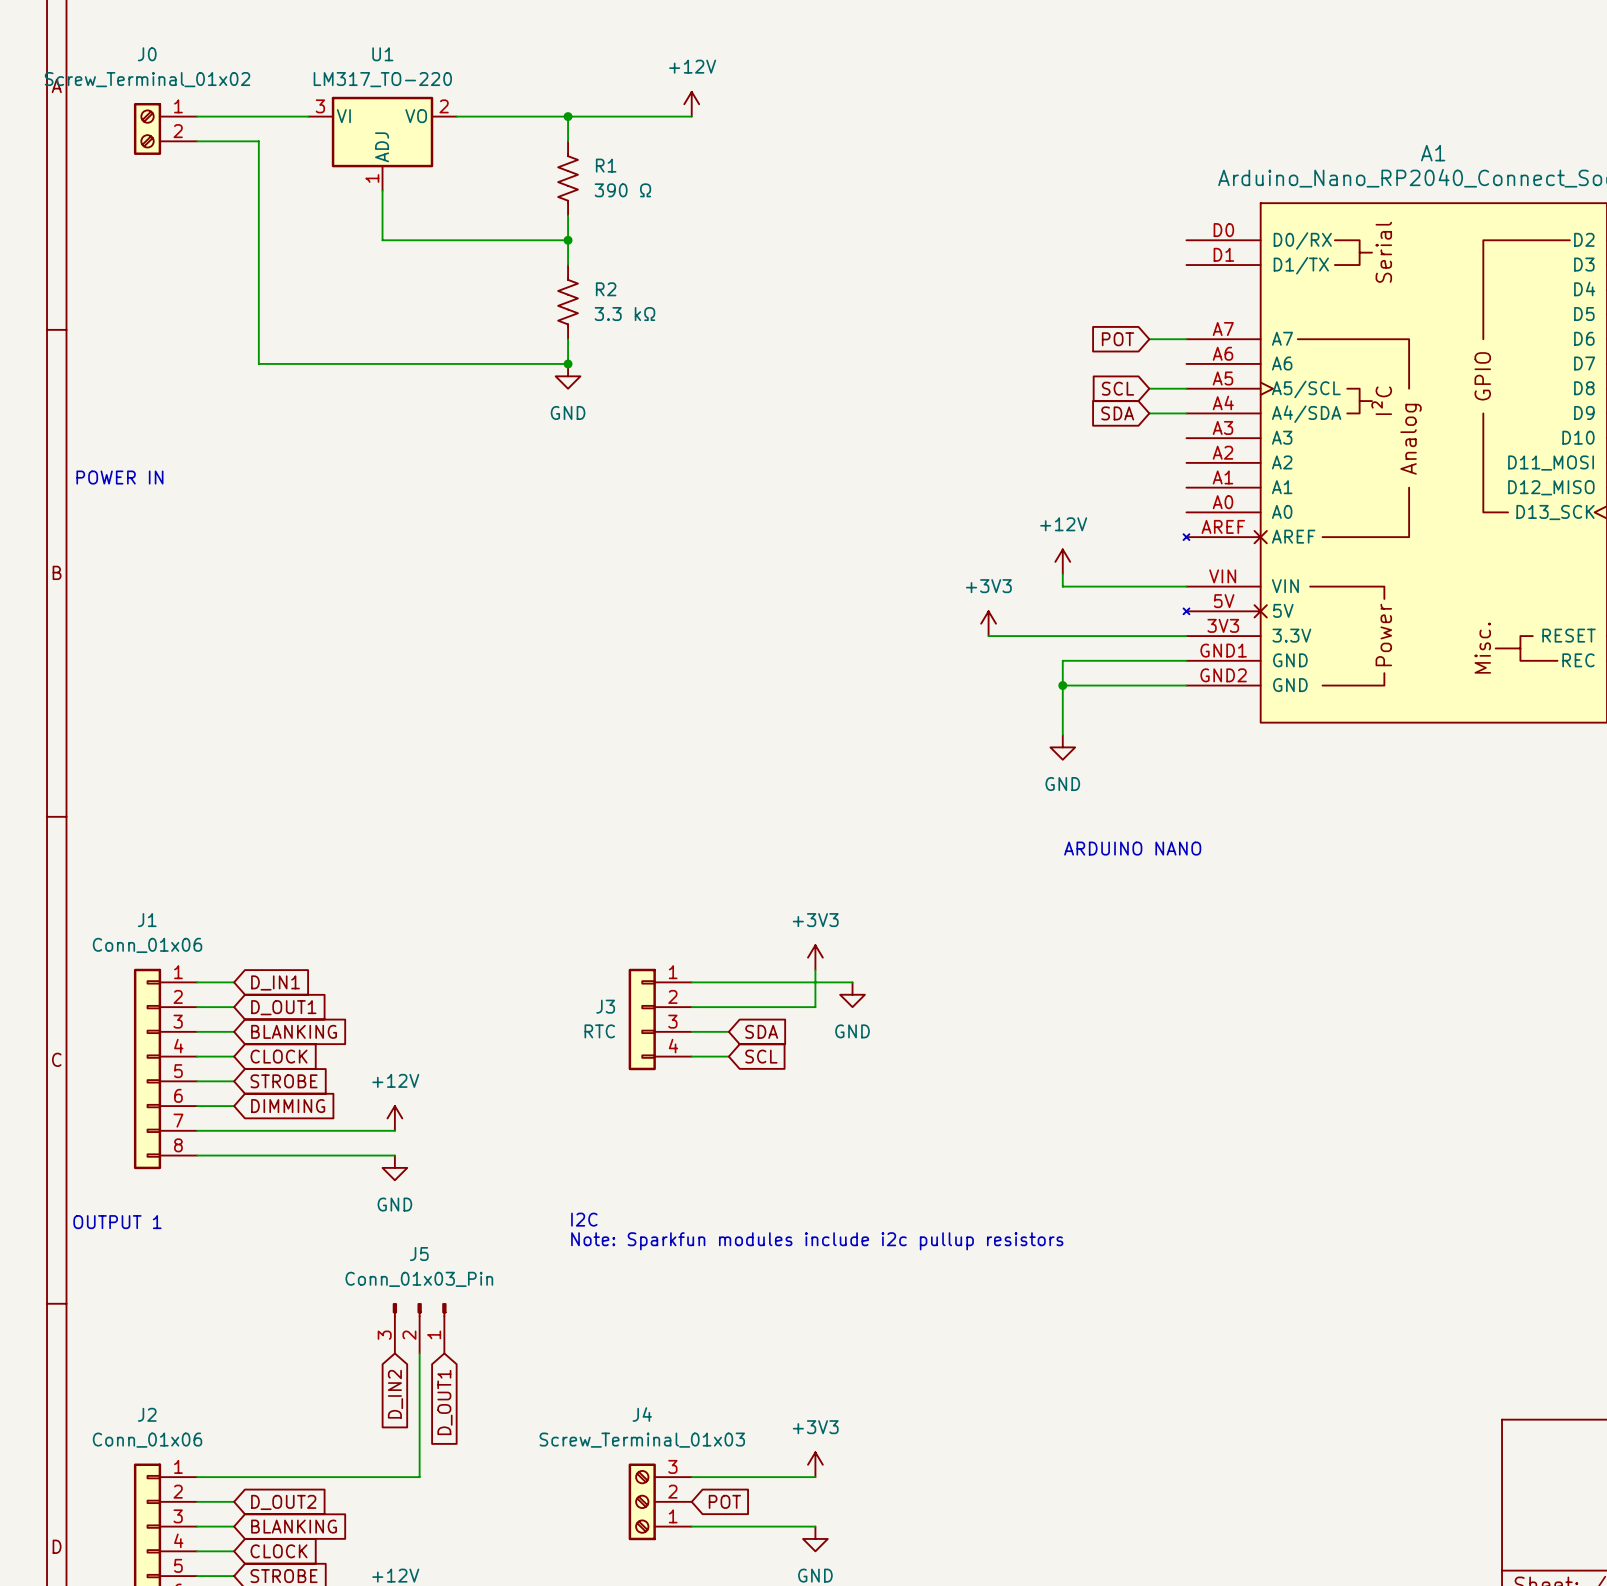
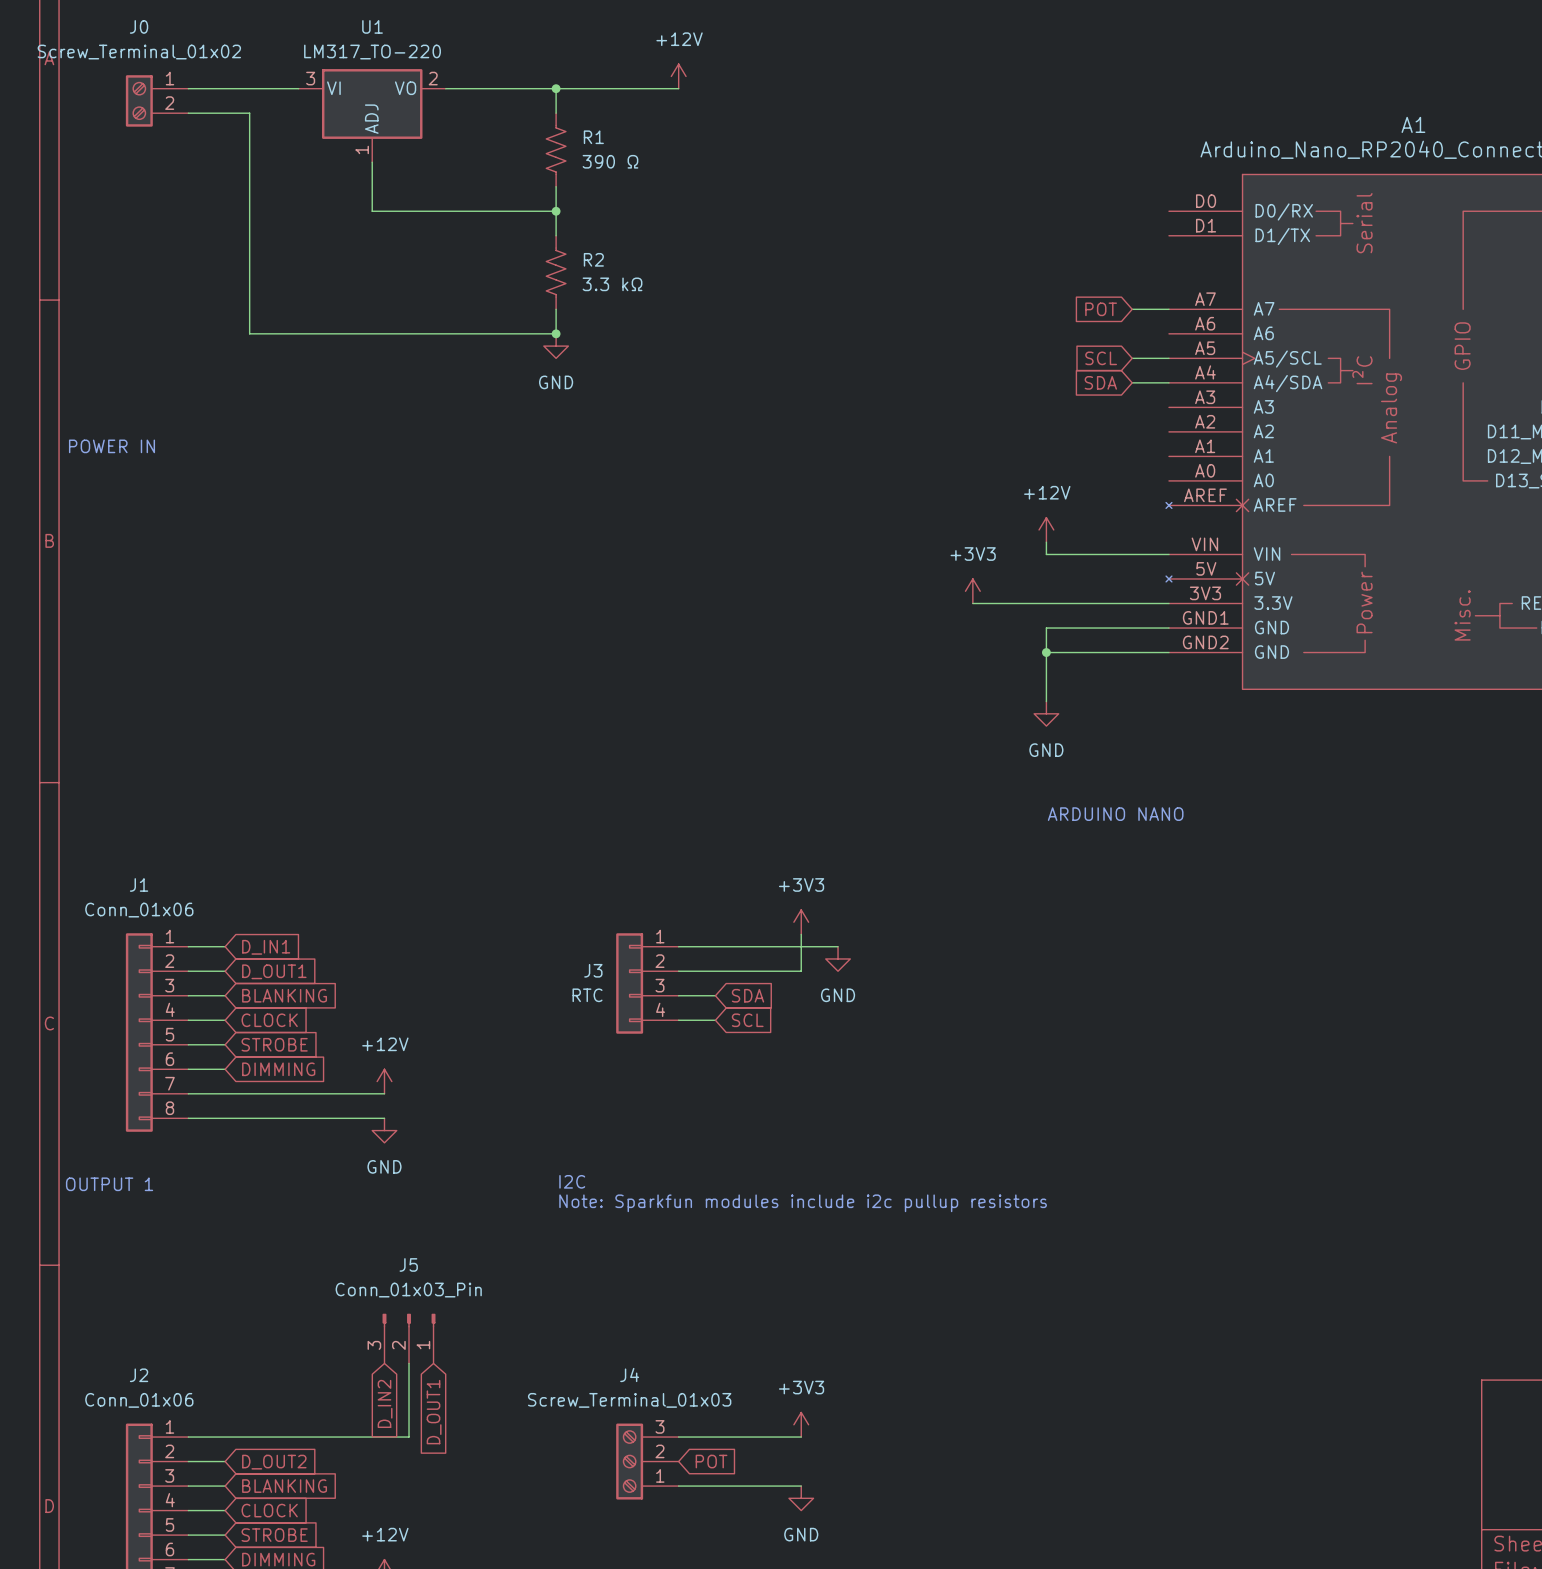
J5 position: (419, 1328) -> (409, 1338)
global label position: D_IN2 (395, 1394) -> D_IN2 (385, 1403)
global label position: D_OUT1 (444, 1402) -> D_OUT1 (434, 1412)

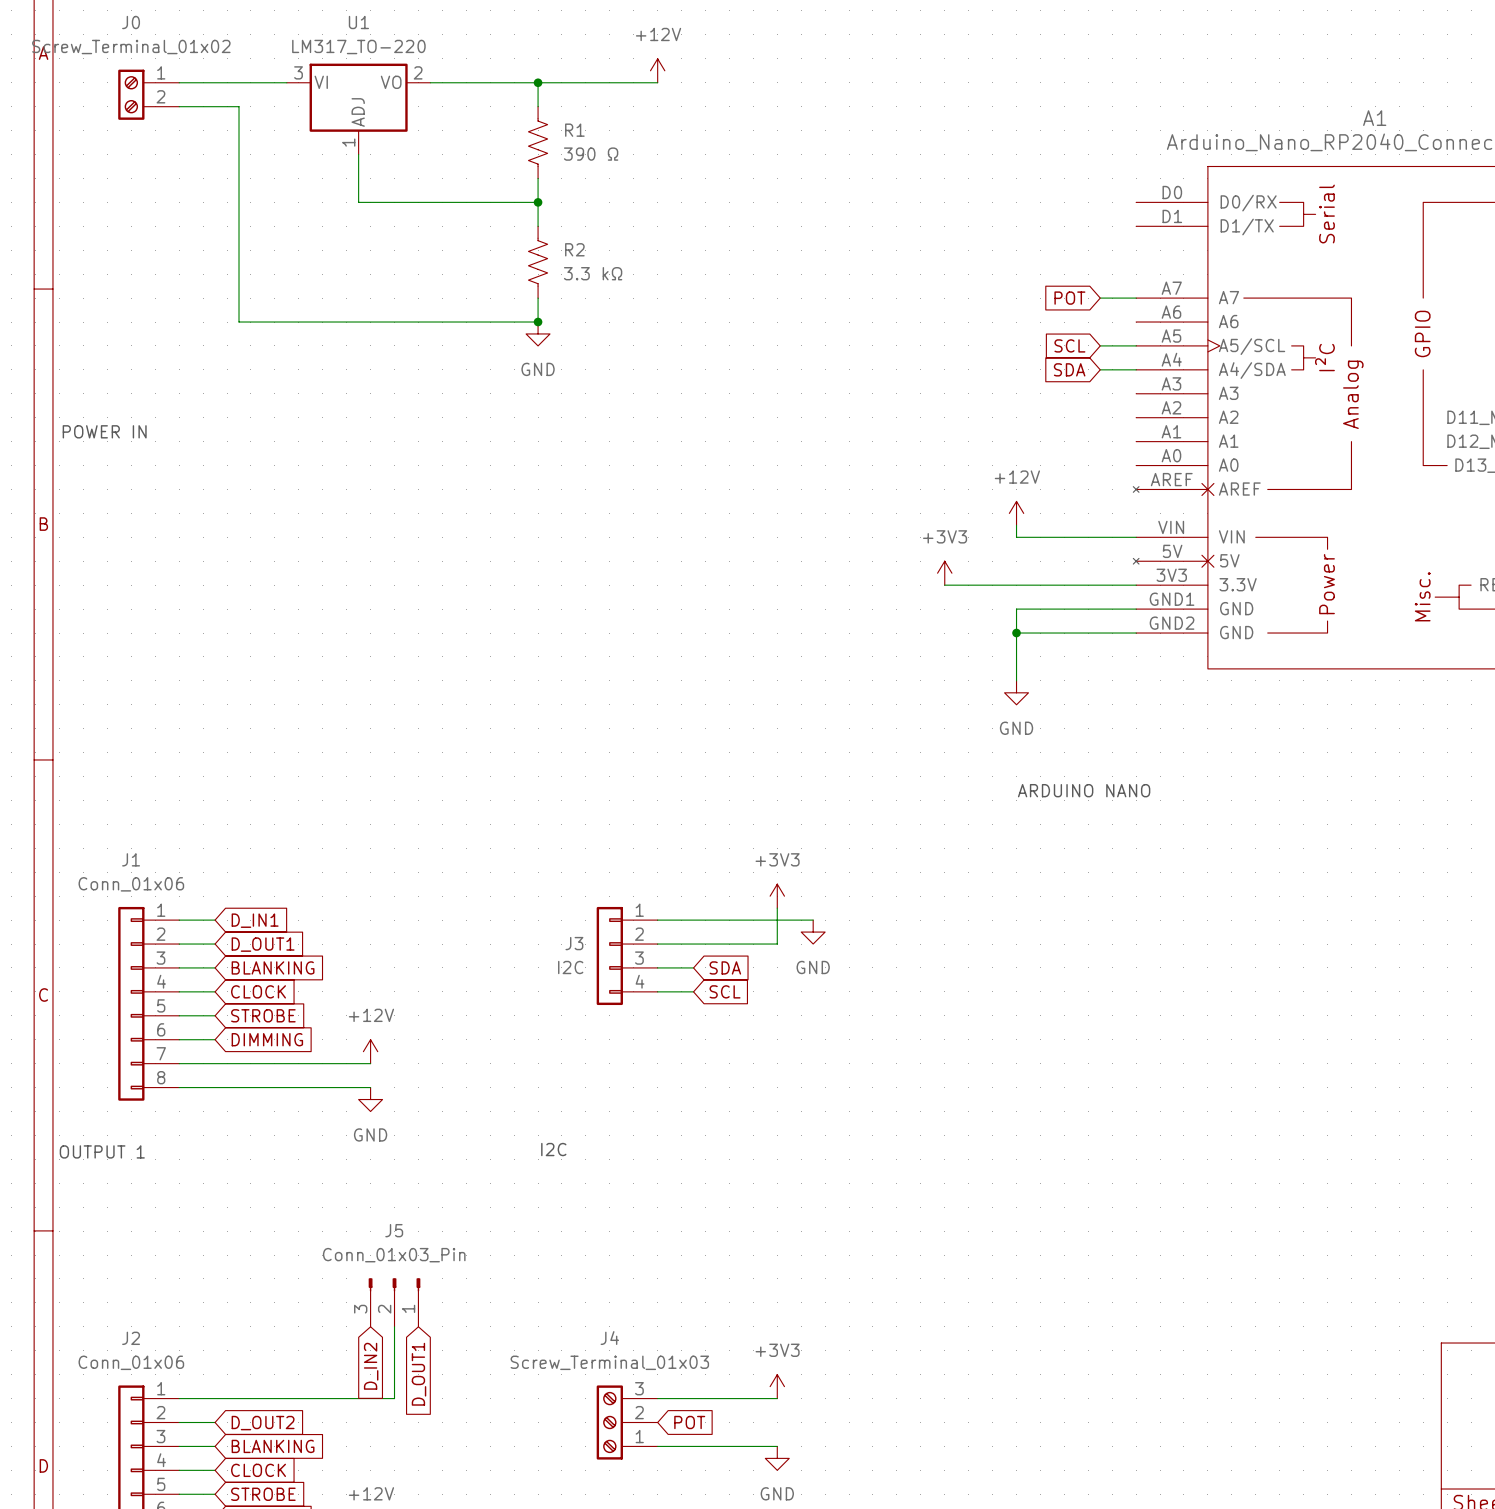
J3 value: RTC (587, 995) -> I2C (570, 967)
text: Note: Sparkfun modules include i2c pullup resistors (803, 1203) -> none

